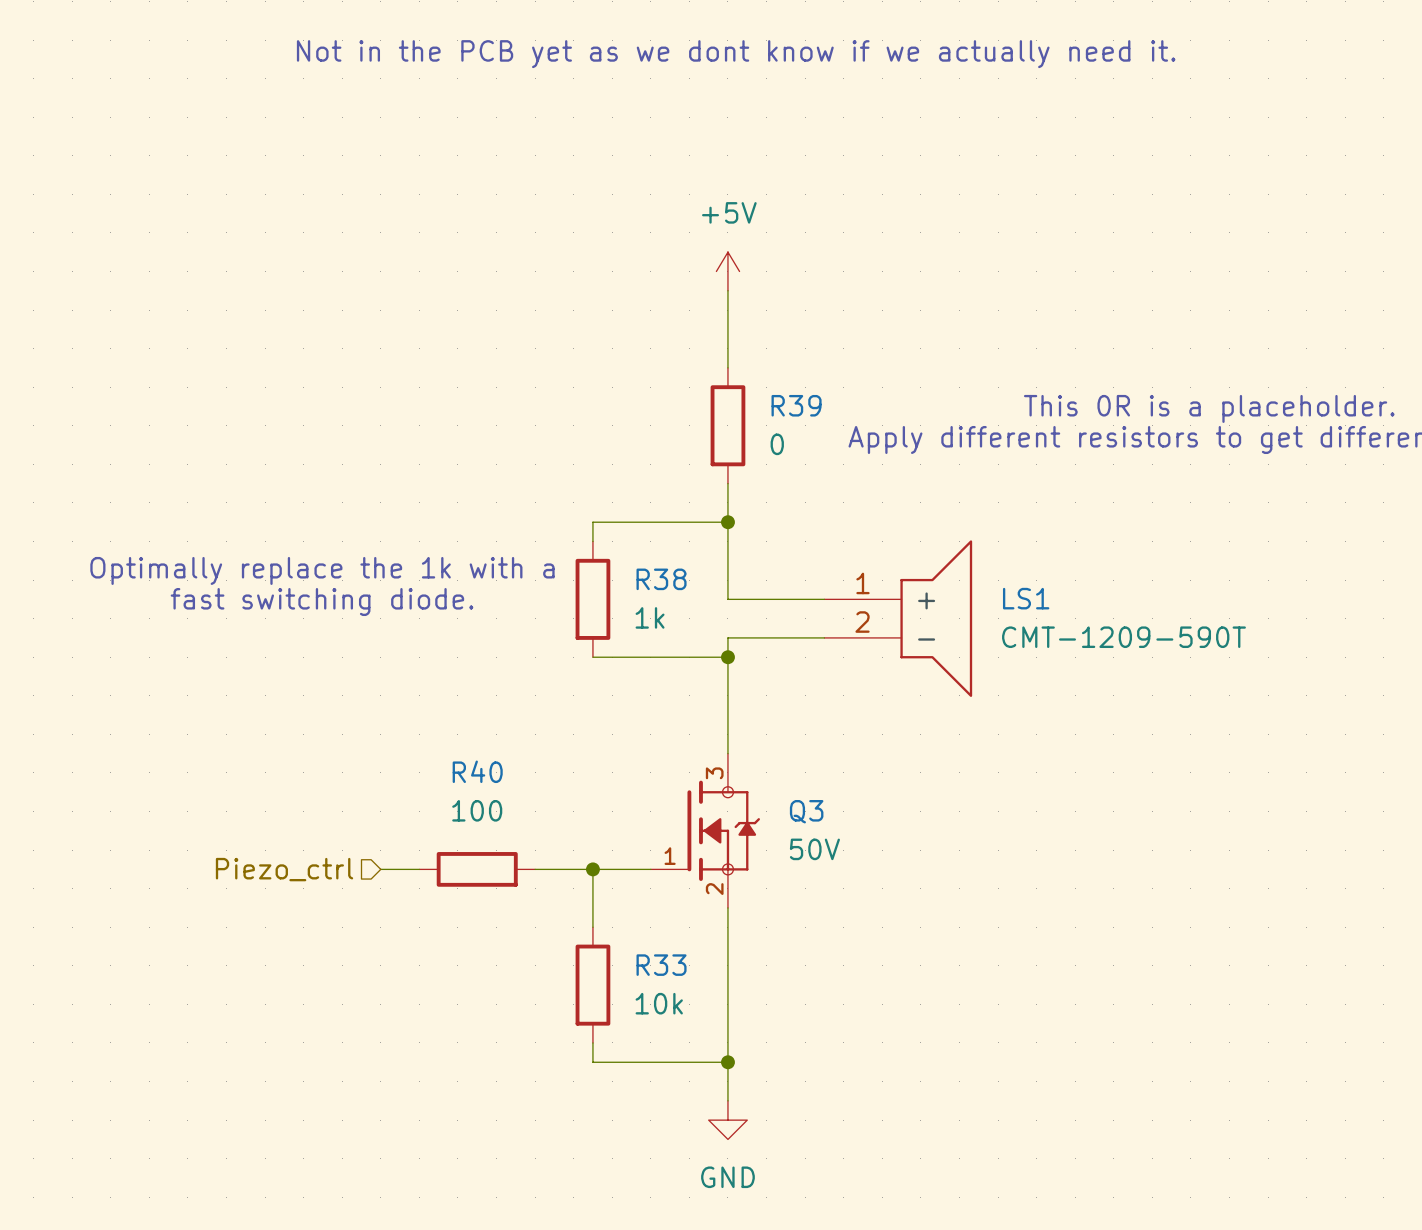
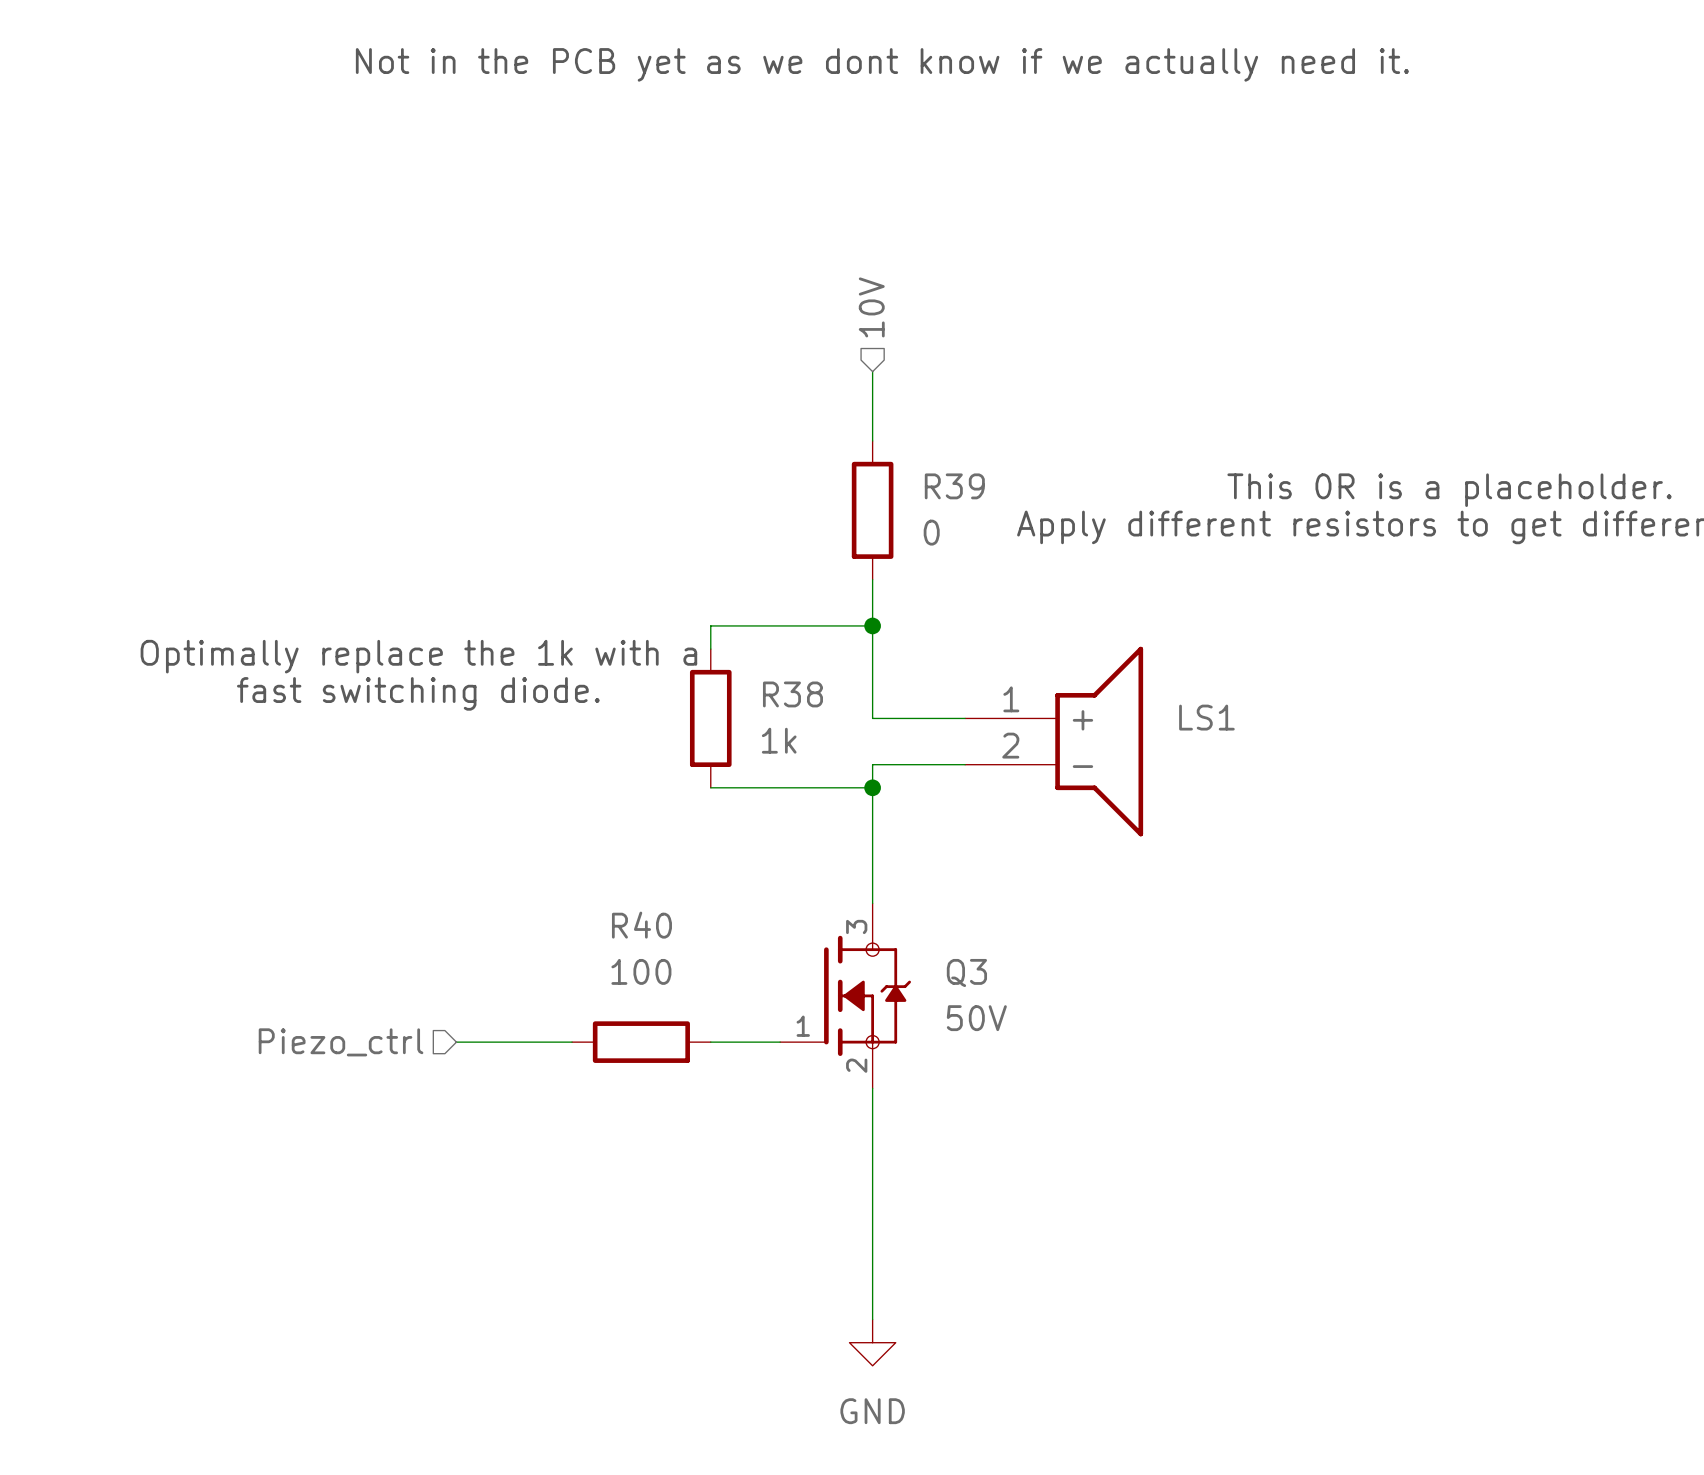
hierarchical label: none -> 10V (871, 307)
power symbol: +5V (727, 271) -> none
wire: (727, 290) (727, 310) -> none
LS1 symbol: [824, 540, 973, 697] -> [965, 646, 1144, 837]
text position: Optimally replace the 1k with a (322, 570) -> Optimally replace the 1k with a (418, 656)
text position: fast switching diode. (322, 602) -> fast switching diode. (418, 693)
LS1 text: CMT-1209-590T (1123, 637) -> none
wire: none -> (502, 1042) (572, 1042)
R40 position: (477, 869) -> (641, 1042)
wire: (535, 869) (592, 869) (592, 927) -> none
junction: (592, 869) -> none
R33: 10k (592, 985) -> none
wire: (592, 1042) (592, 1062) (727, 1062) -> none
junction: (727, 1062) -> none

